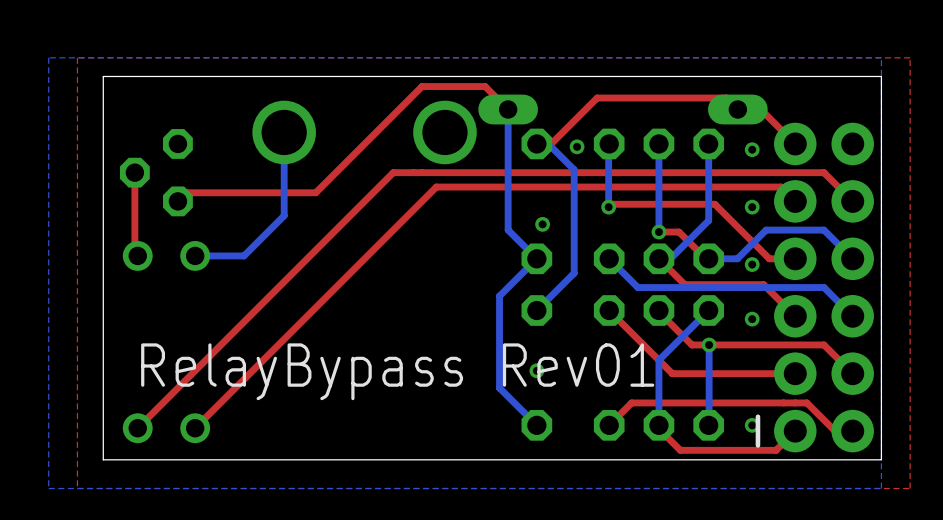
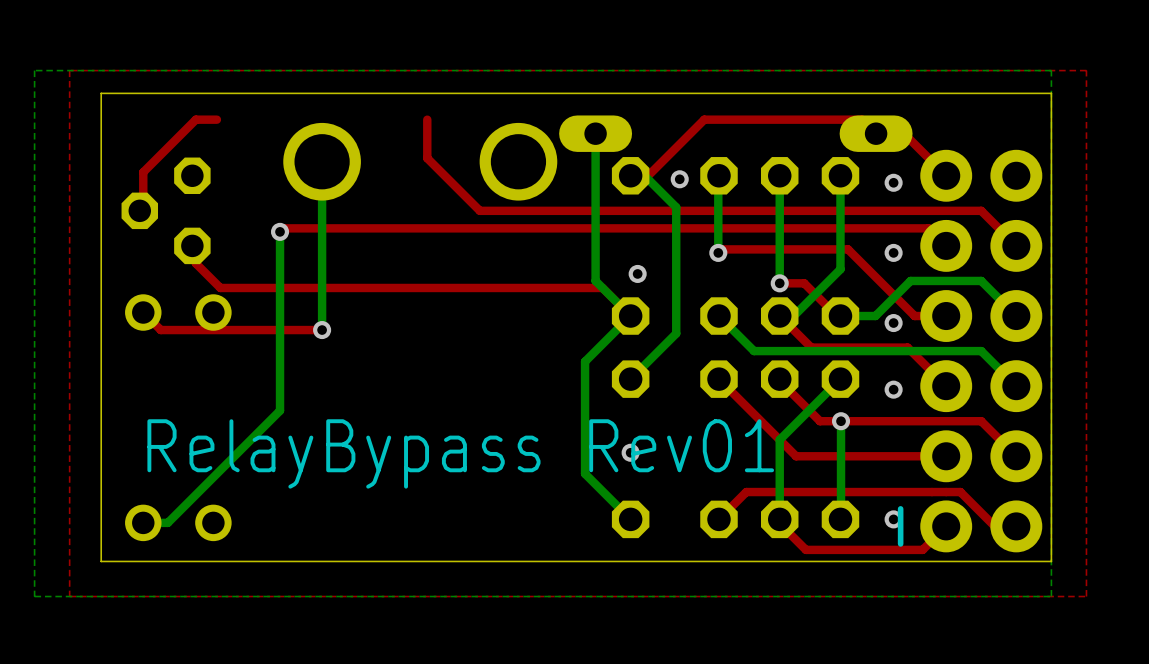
top track: none -> (216, 119) (195, 119) (143, 172) (143, 224)
top track: (508, 109) (485, 86) (422, 86) (315, 192) (186, 192) (177, 201) (177, 204) -> none
top track: (134, 172) (134, 253) (137, 255) -> (322, 330) (160, 330) (143, 312)
top track: (413, 172) (393, 172) (137, 428) -> (479, 210) (427, 158) (427, 119)
top track: (436, 187) (195, 428) -> (507, 228) (283, 228) (280, 231)
bottom track: none -> (280, 231) (280, 410) (167, 522) (143, 522)
via: none -> (280, 231)
top track: none -> (195, 259) (195, 263) (220, 287) (602, 287) (630, 316)
bottom track: (284, 215) (243, 255) (195, 255) -> (322, 263) (322, 330)
via: none -> (322, 330)

